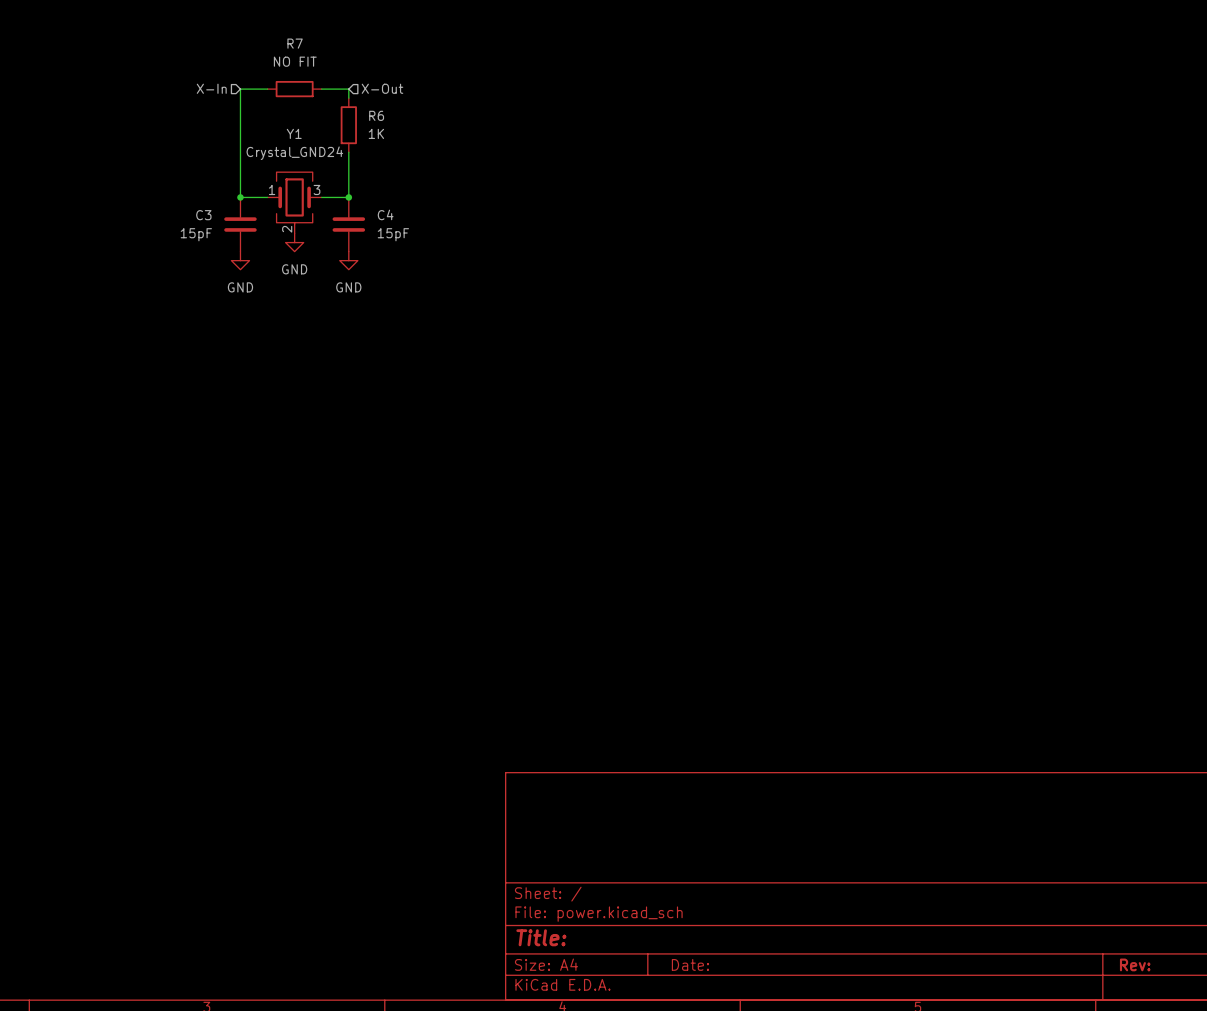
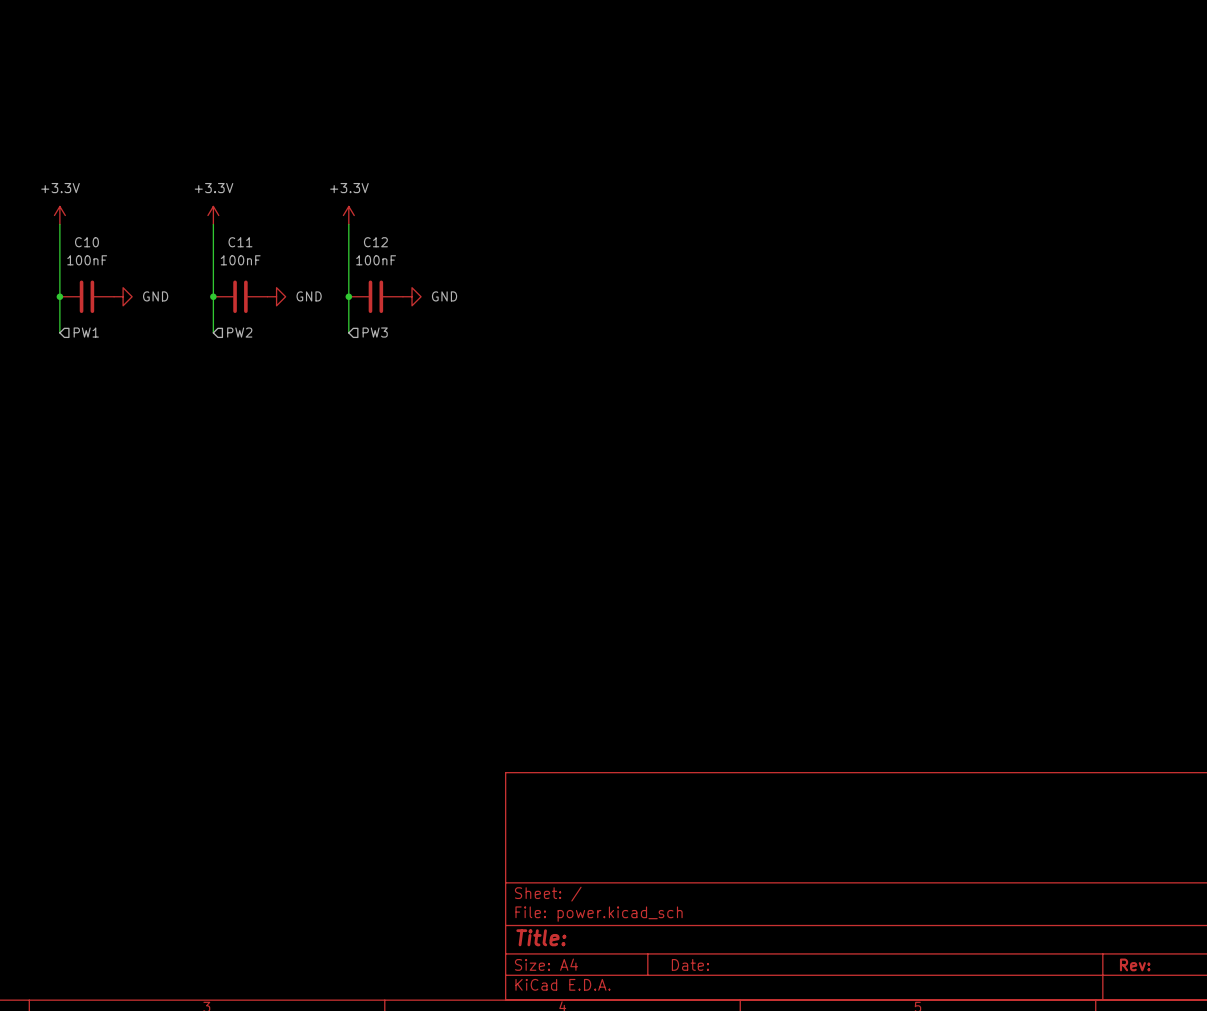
hierarchical label: X-In (211, 88) -> none
hierarchical label: X-Out (382, 88) -> none
wire: (267, 89) (240, 89) (240, 197) (267, 197) -> none
R7: NO FIT (294, 89) -> none
wire: (321, 89) (348, 89) (348, 98) -> none
R6: 1K (348, 125) -> none
wire: (348, 152) (348, 197) (321, 197) -> none
junction: (240, 197) -> none
junction: (348, 197) -> none
Y1: Crystal_GND24 (294, 202) -> none
power symbol: none -> +3.3V (59, 215)
power symbol: none -> +3.3V (213, 215)
power symbol: none -> +3.3V (348, 215)
wire: none -> (59, 224) (59, 332)
wire: none -> (213, 224) (213, 332)
C3: 15pF (240, 224) -> none
wire: none -> (348, 224) (348, 332)
C4: 15pF (348, 224) -> none
power symbol: GND (294, 242) -> none
power symbol: GND (240, 260) -> none
power symbol: GND (348, 260) -> none
junction: none -> (59, 296)
C10: none -> 100nF (86, 296)
power symbol: none -> GND (123, 296)
junction: none -> (213, 296)
C11: none -> 100nF (240, 296)
power symbol: none -> GND (276, 296)
junction: none -> (348, 296)
C12: none -> 100nF (375, 296)
power symbol: none -> GND (412, 296)
hierarchical label: none -> PW1 (86, 332)
hierarchical label: none -> PW2 (239, 332)
hierarchical label: none -> PW3 (375, 332)

